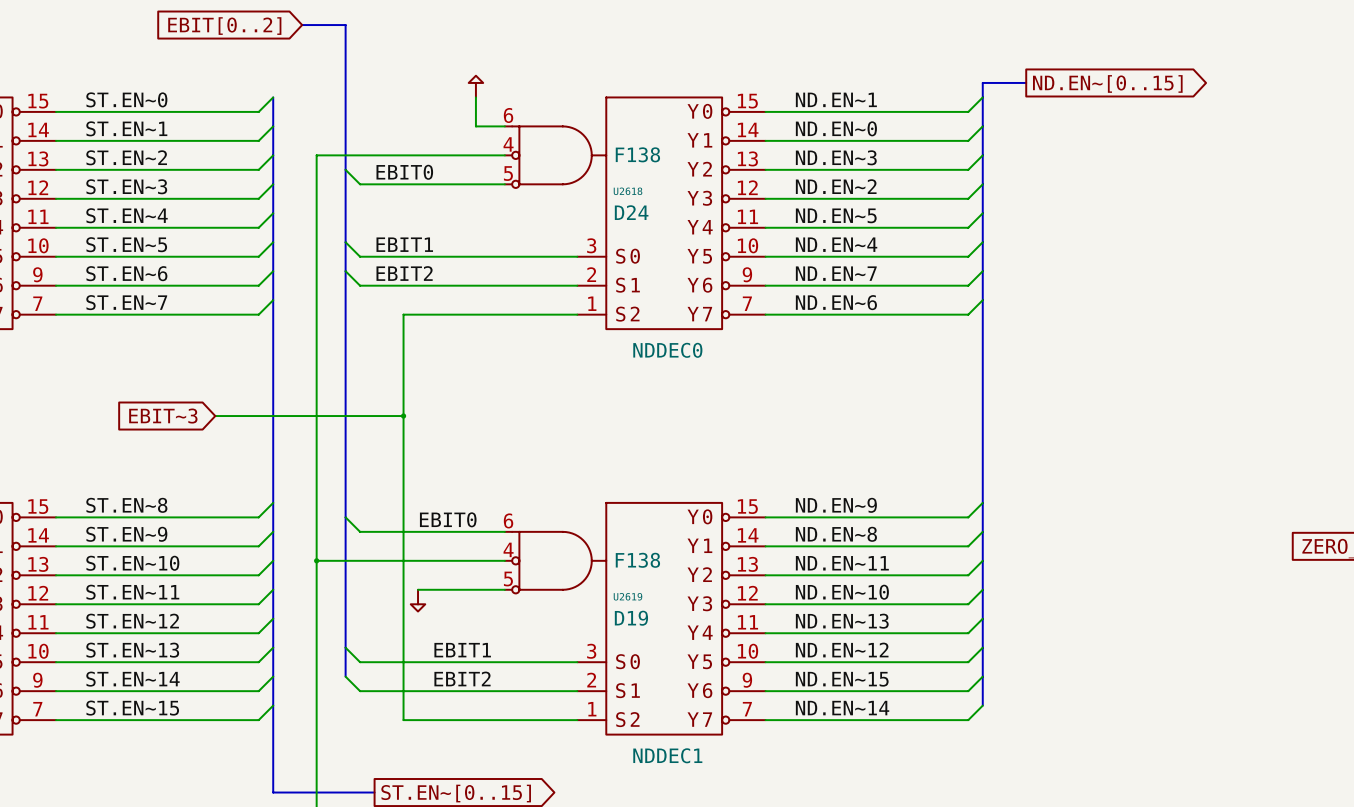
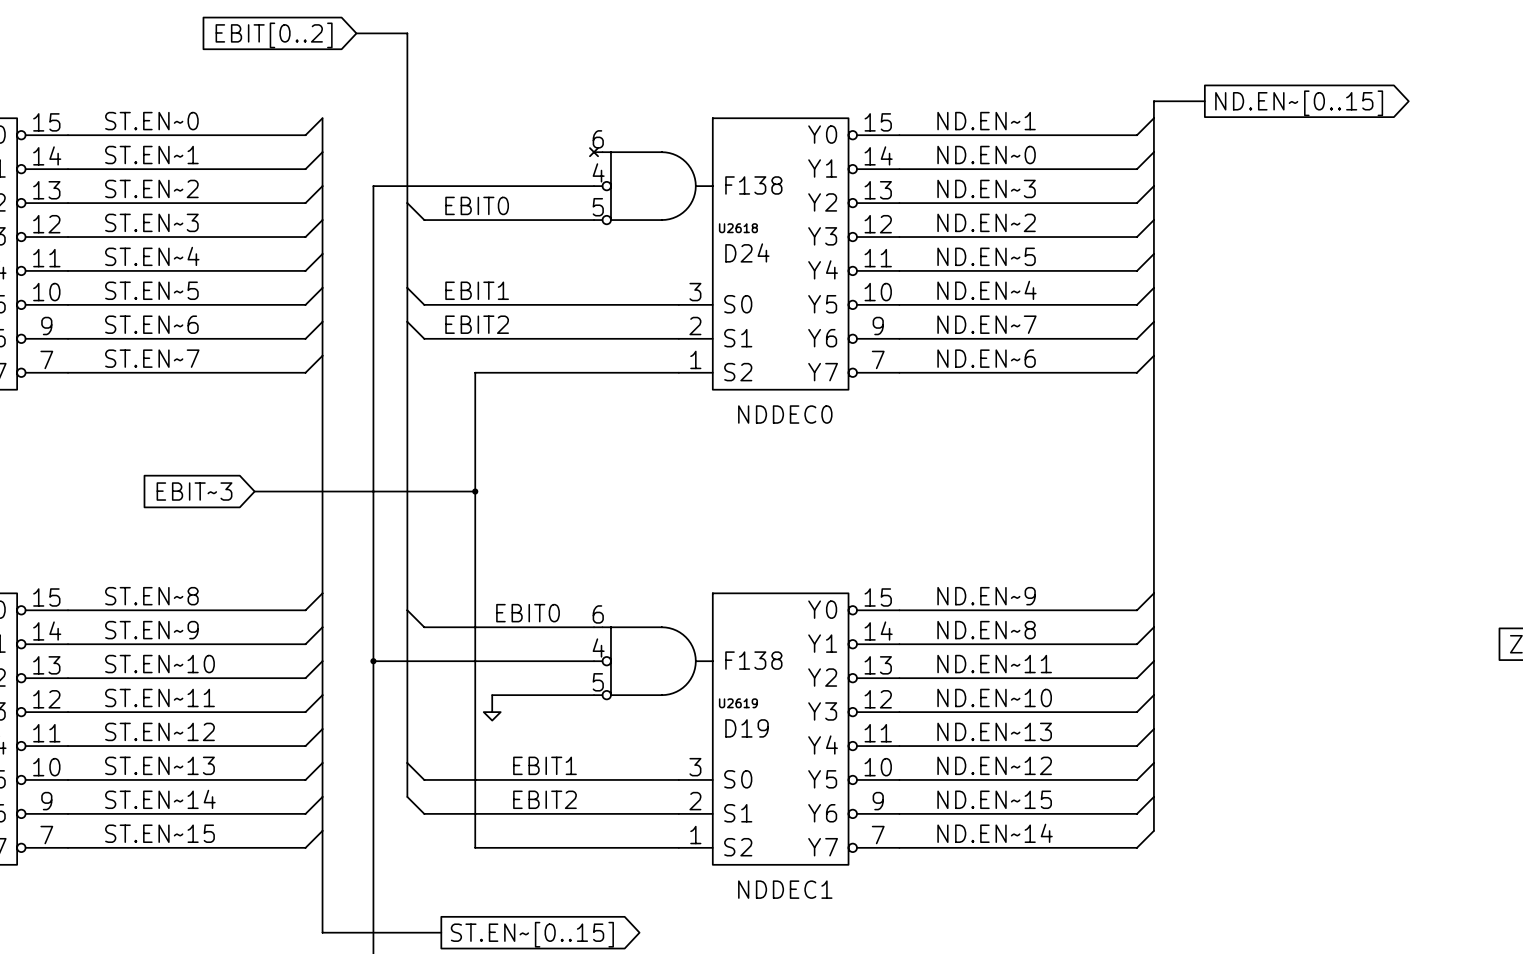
power symbol: (475, 86) -> none
wire: (475, 97) (475, 126) (504, 126) -> none
no-connect mark: none -> (594, 152)

